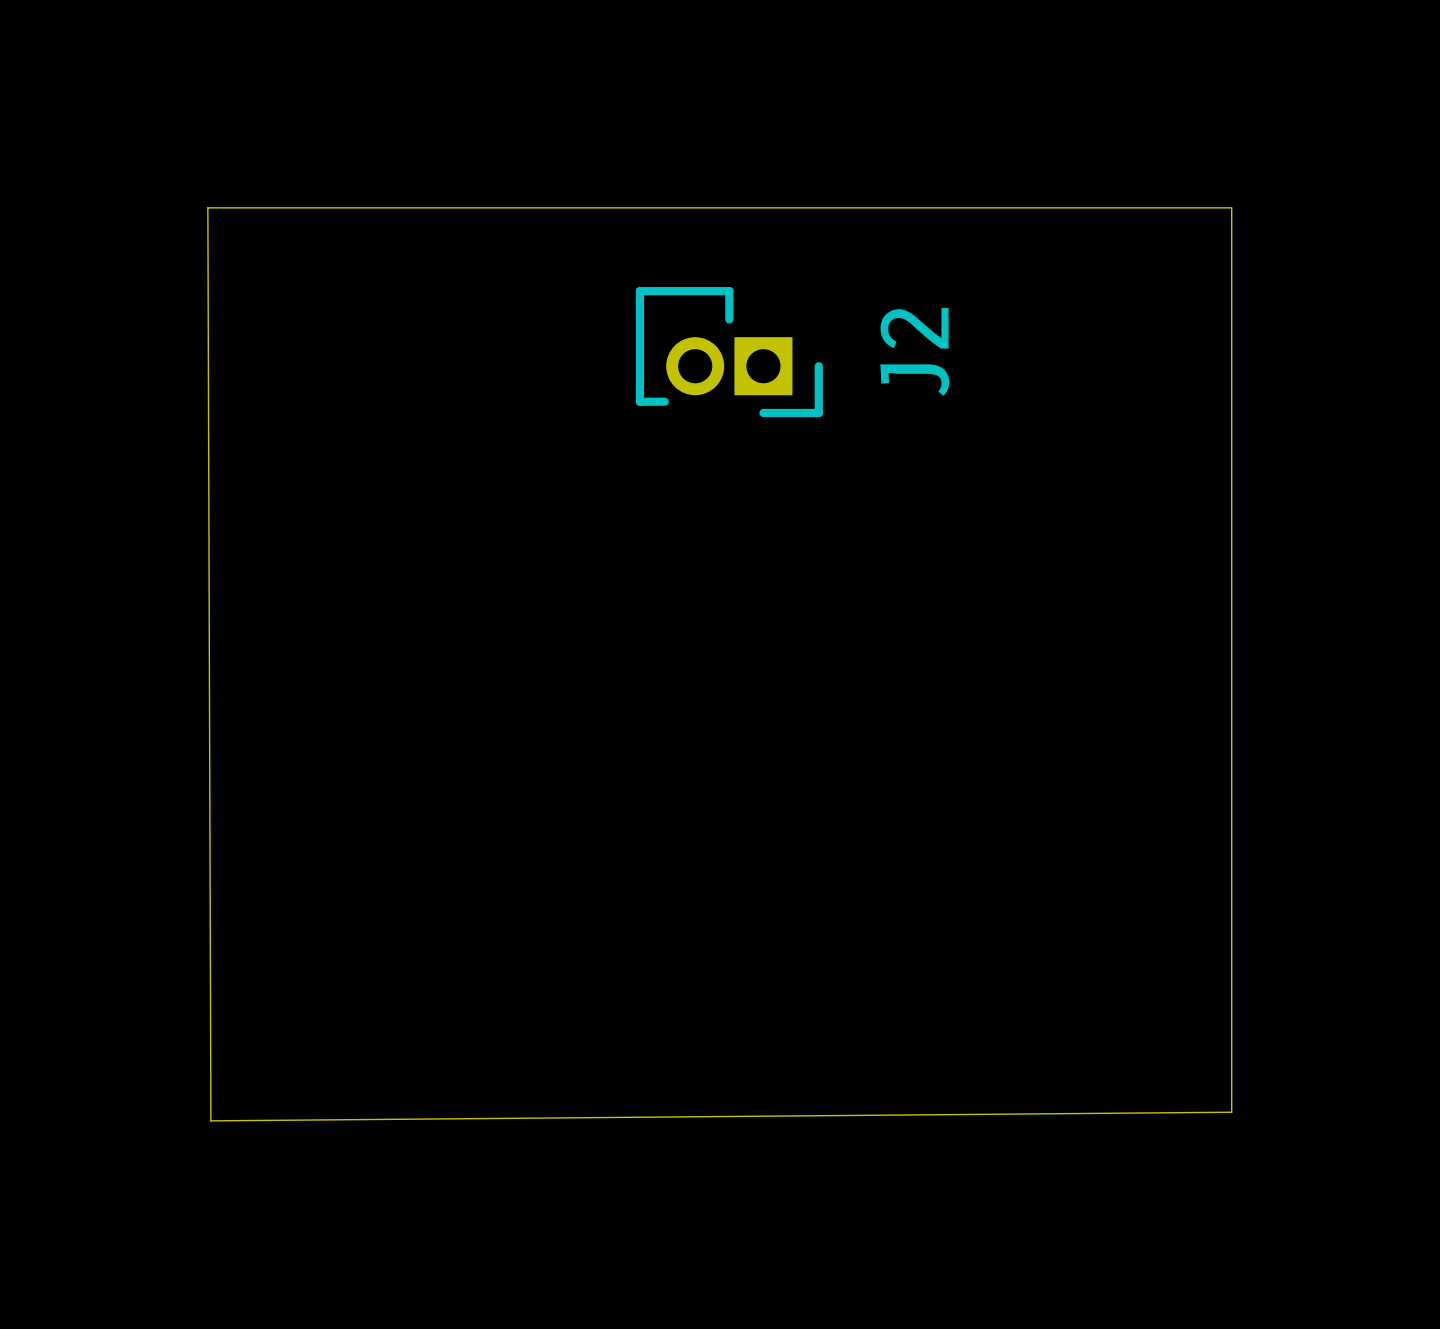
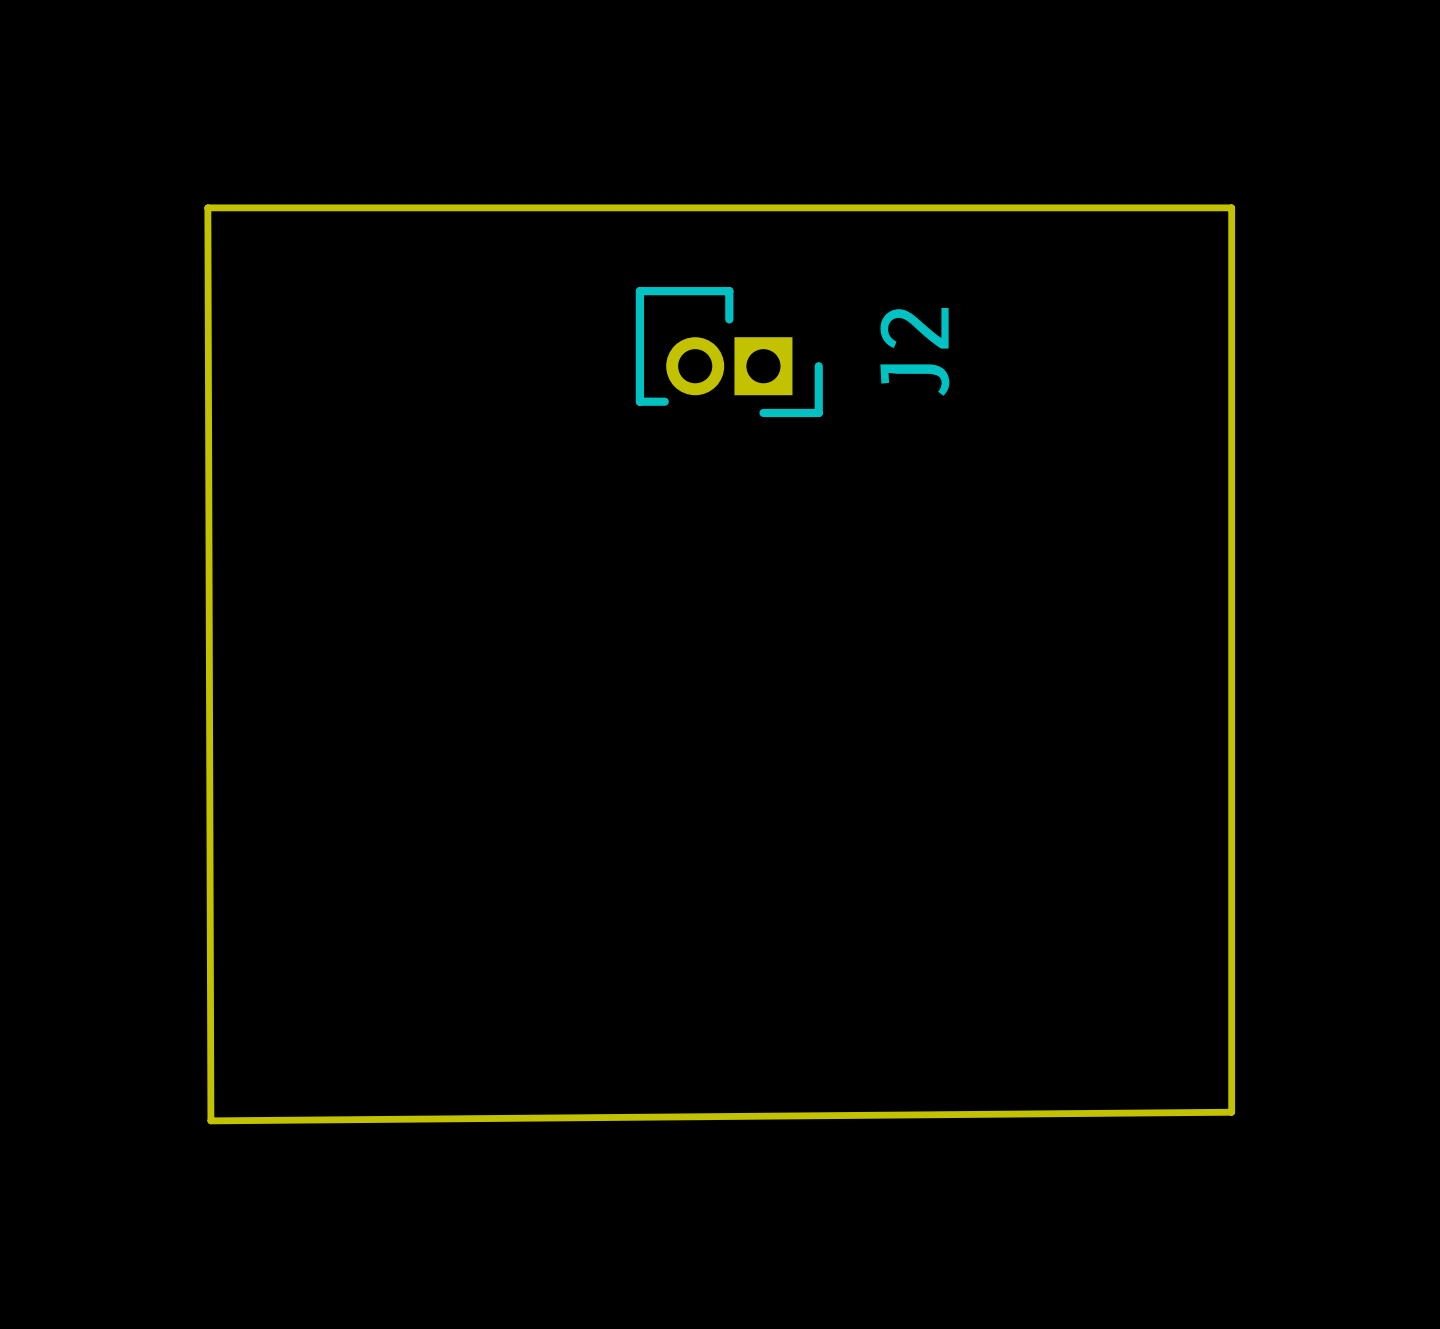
board edge width: thin (207, 207) (1231, 207) (1231, 1112) (210, 1120) (207, 207) -> thick (207, 207) (1231, 207) (1231, 1112) (210, 1120) (207, 207)

